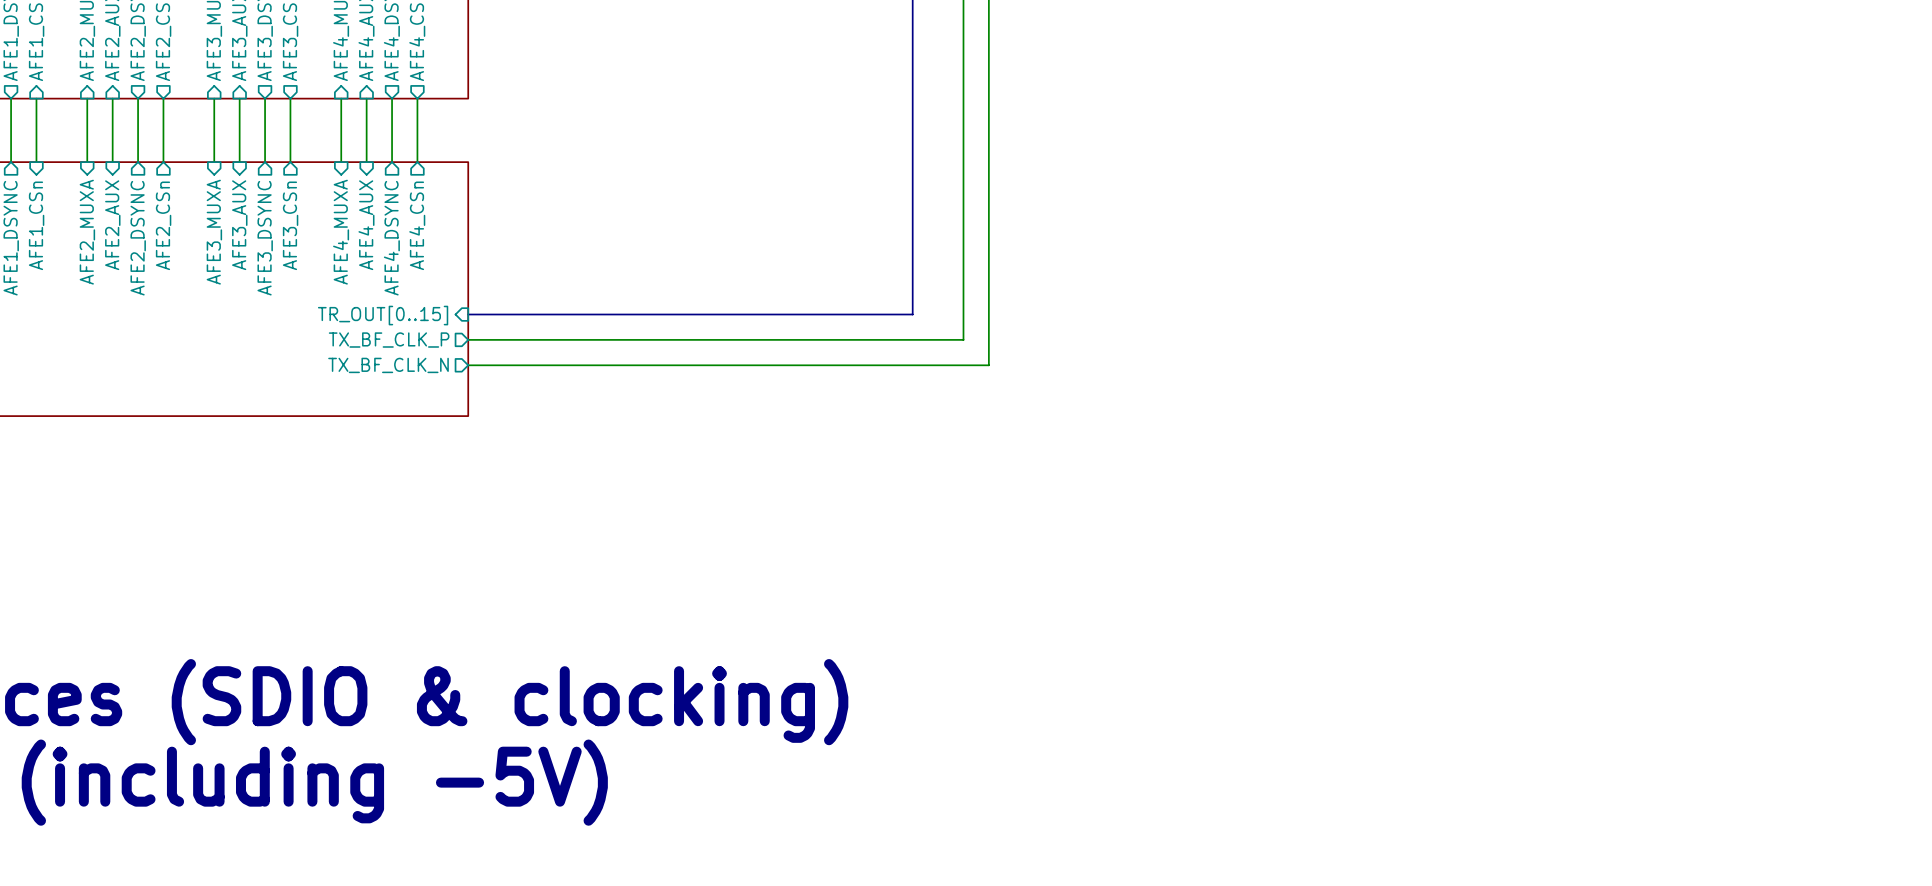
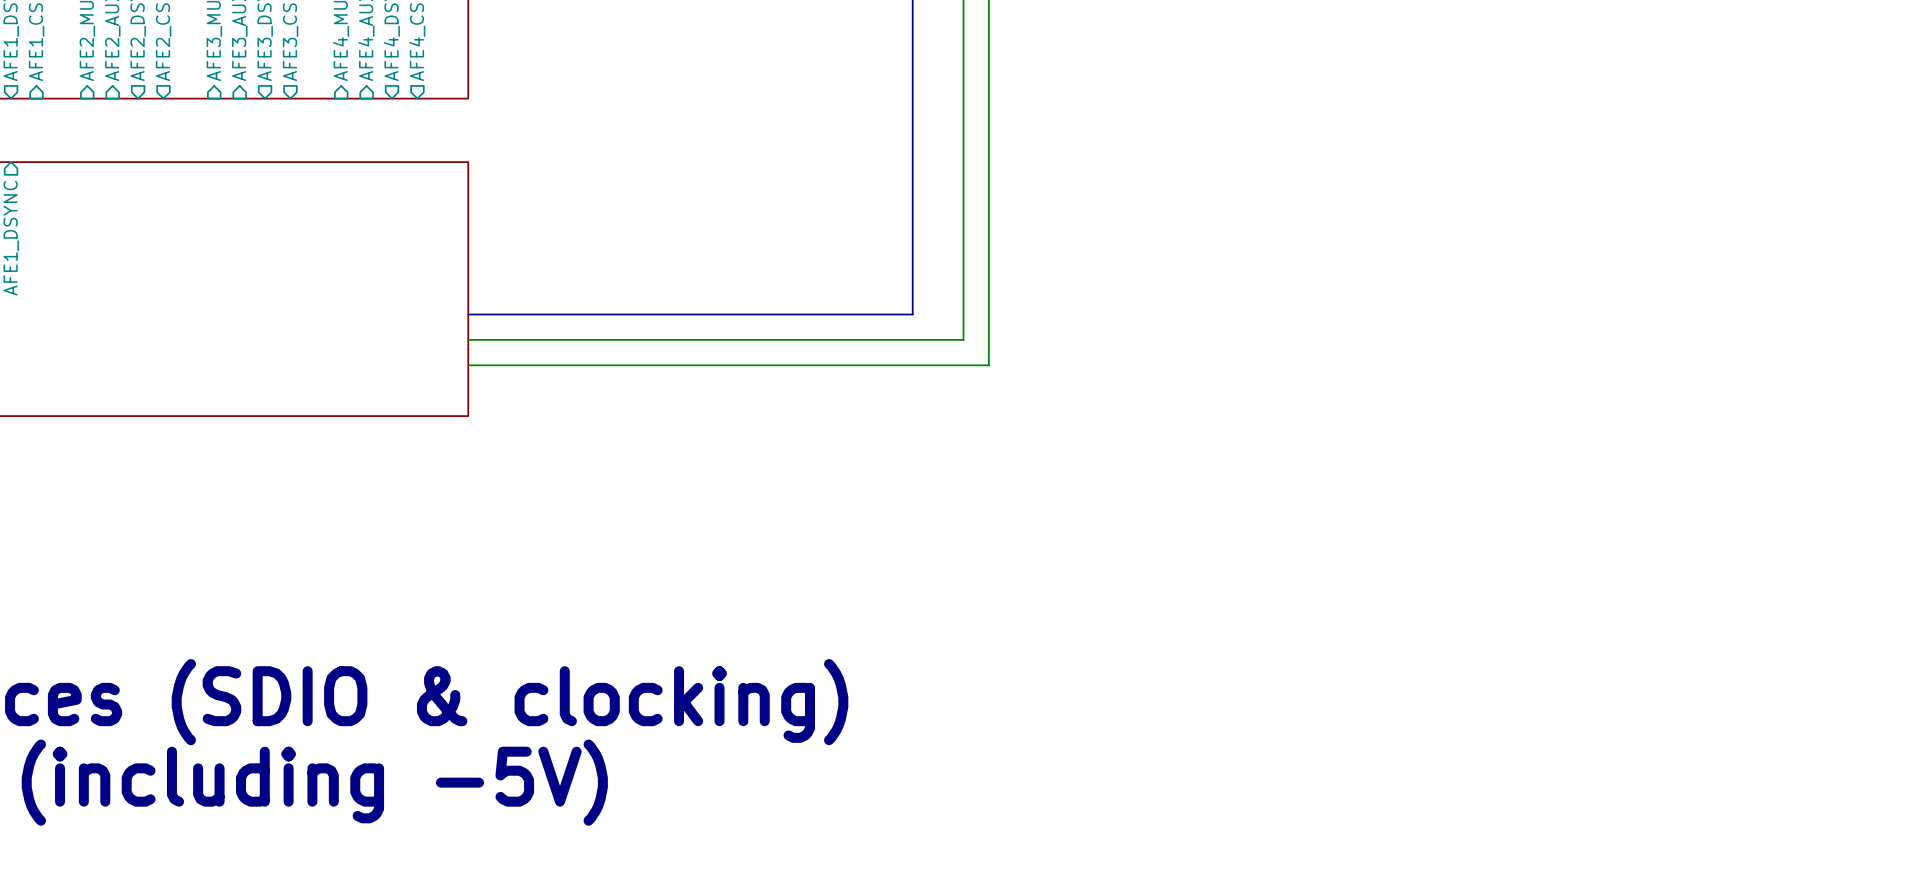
wire: (11, 98) (11, 162) -> none
wire: (36, 98) (36, 162) -> none
wire: (87, 98) (87, 162) -> none
wire: (112, 98) (112, 162) -> none
wire: (138, 98) (138, 162) -> none
wire: (163, 98) (163, 162) -> none
wire: (214, 98) (214, 162) -> none
wire: (239, 98) (239, 162) -> none
wire: (265, 98) (265, 162) -> none
wire: (290, 98) (290, 162) -> none
wire: (341, 98) (341, 162) -> none
wire: (366, 98) (366, 162) -> none
wire: (392, 98) (392, 162) -> none
wire: (417, 98) (417, 162) -> none
sheet pin: AFE1_CSn (36, 225) -> none
sheet pin: AFE2_AUX (112, 225) -> none
sheet pin: AFE2_CSn (163, 225) -> none
sheet pin: AFE3_AUX (239, 225) -> none
sheet pin: AFE3_CSn (290, 225) -> none
sheet pin: AFE4_AUX (366, 225) -> none
sheet pin: AFE4_CSn (417, 225) -> none
sheet pin: AFE2_MUXA (87, 232) -> none
sheet pin: AFE3_MUXA (214, 232) -> none
sheet pin: AFE4_MUXA (341, 232) -> none
sheet pin: AFE2_DSYNC (138, 238) -> none
sheet pin: AFE3_DSYNC (265, 238) -> none
sheet pin: AFE4_DSYNC (391, 238) -> none
sheet pin: TR_OUT[0..15] (383, 315) -> none
sheet pin: TX_BF_CLK_P (389, 340) -> none
sheet pin: TX_BF_CLK_N (388, 365) -> none

